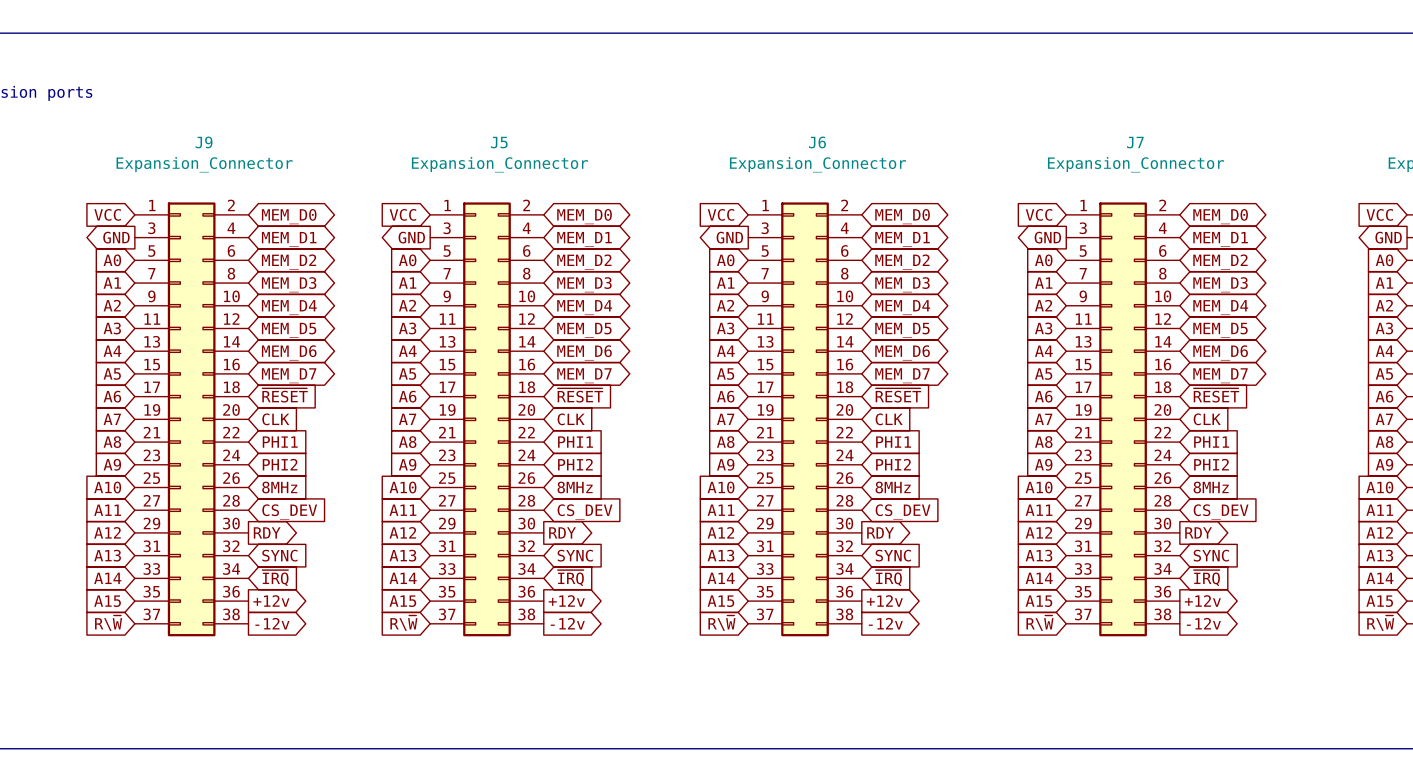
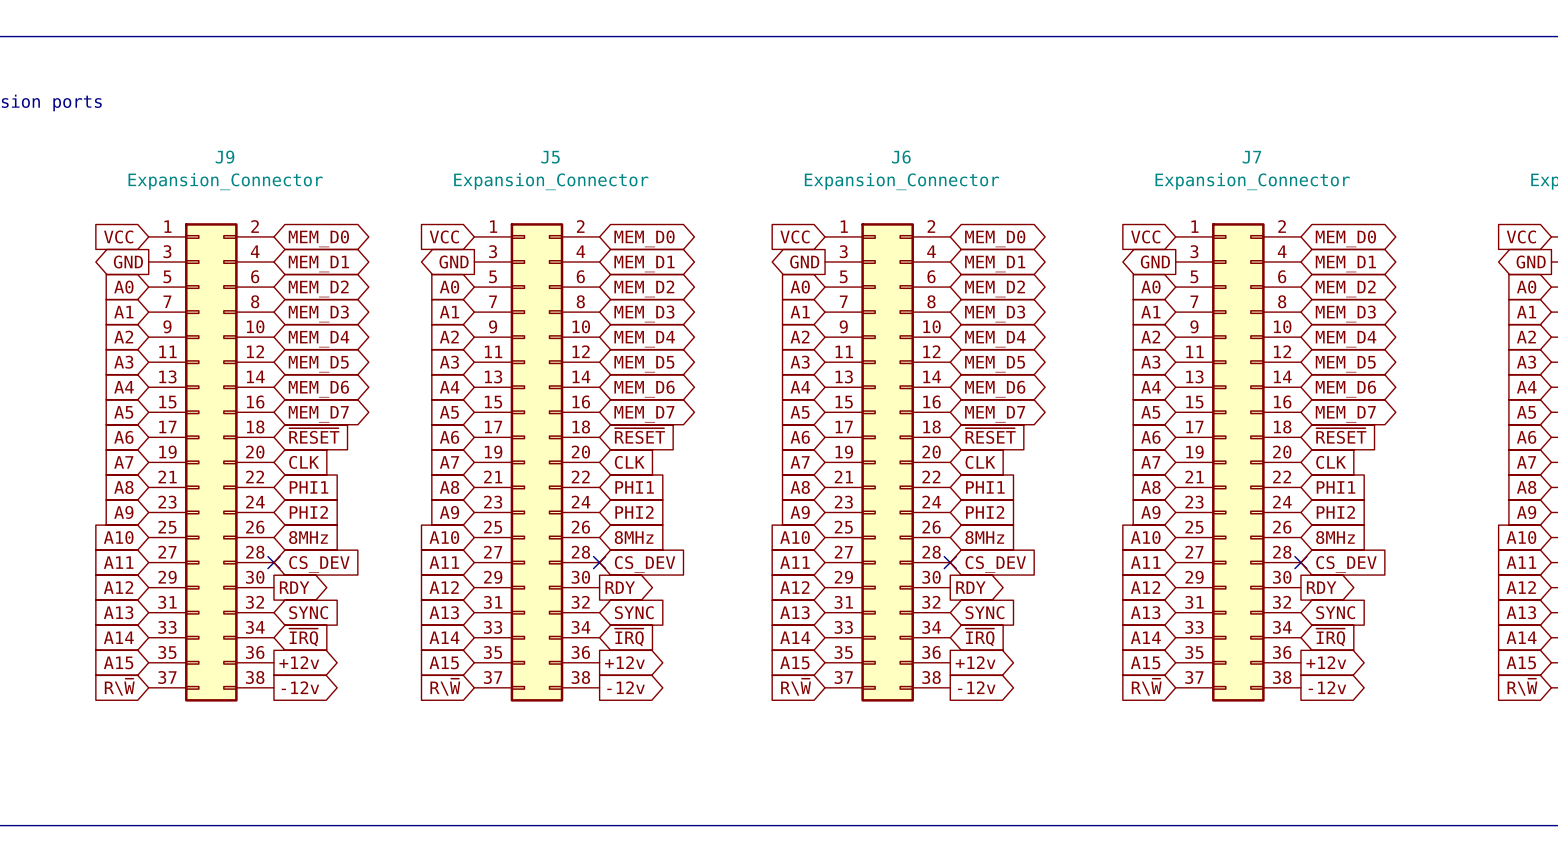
no-connect mark: none -> (273, 562)
no-connect mark: none -> (599, 562)
no-connect mark: none -> (950, 562)
no-connect mark: none -> (1300, 562)

